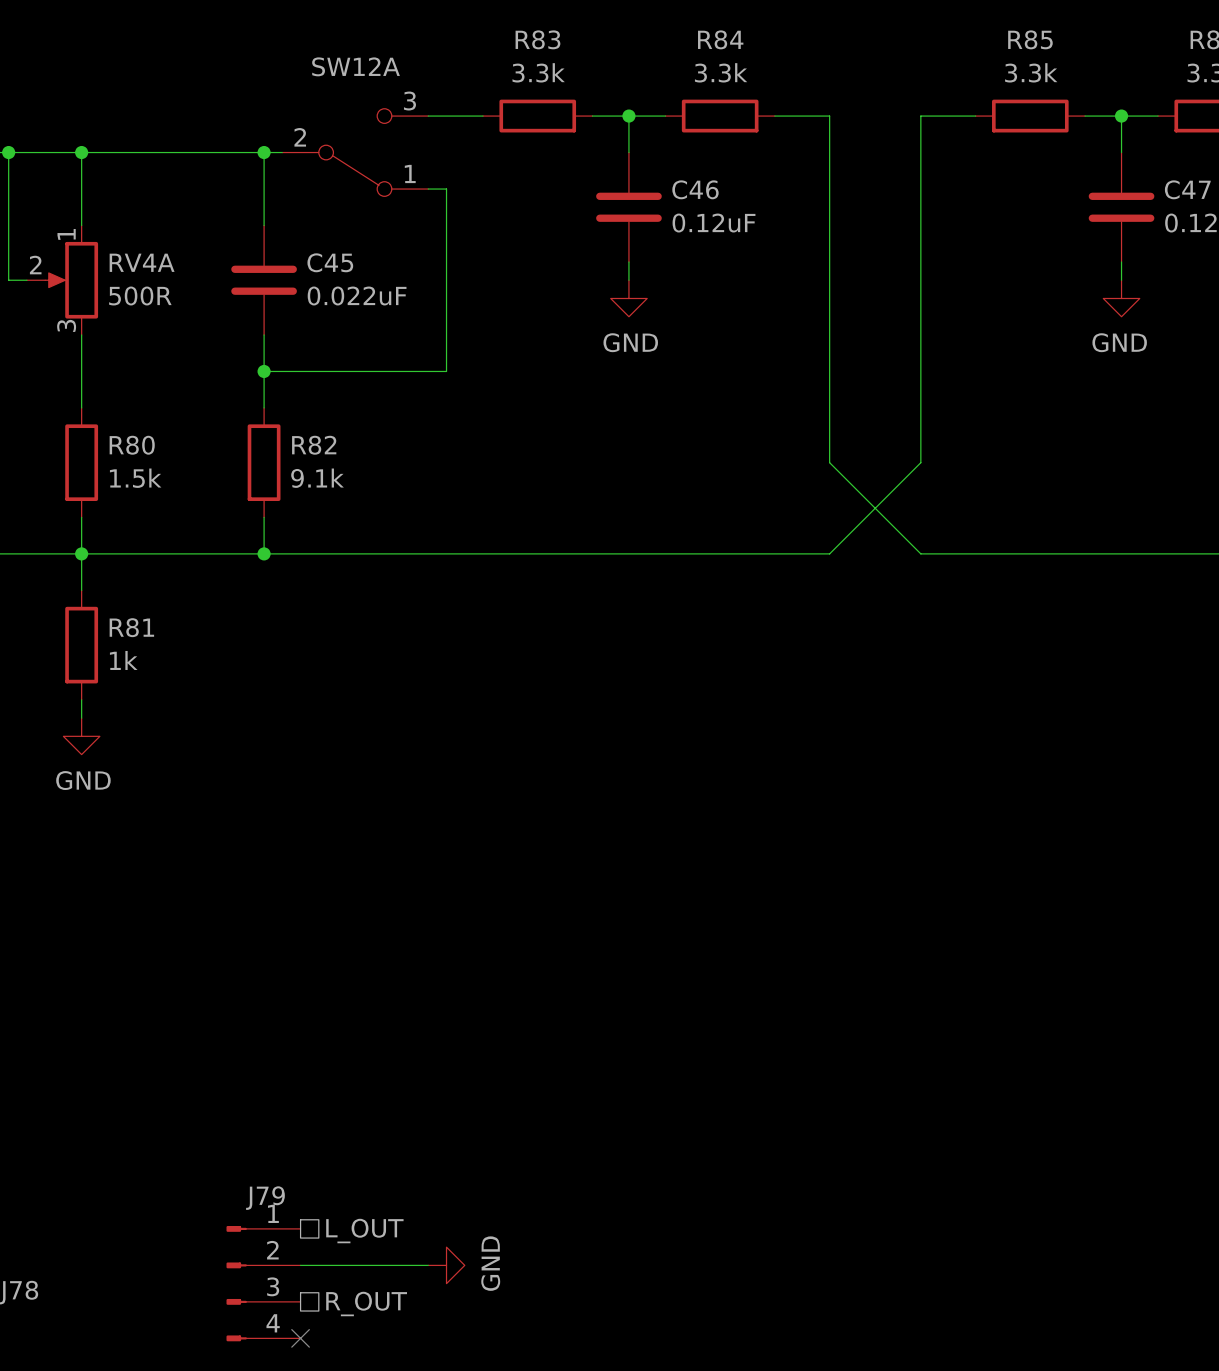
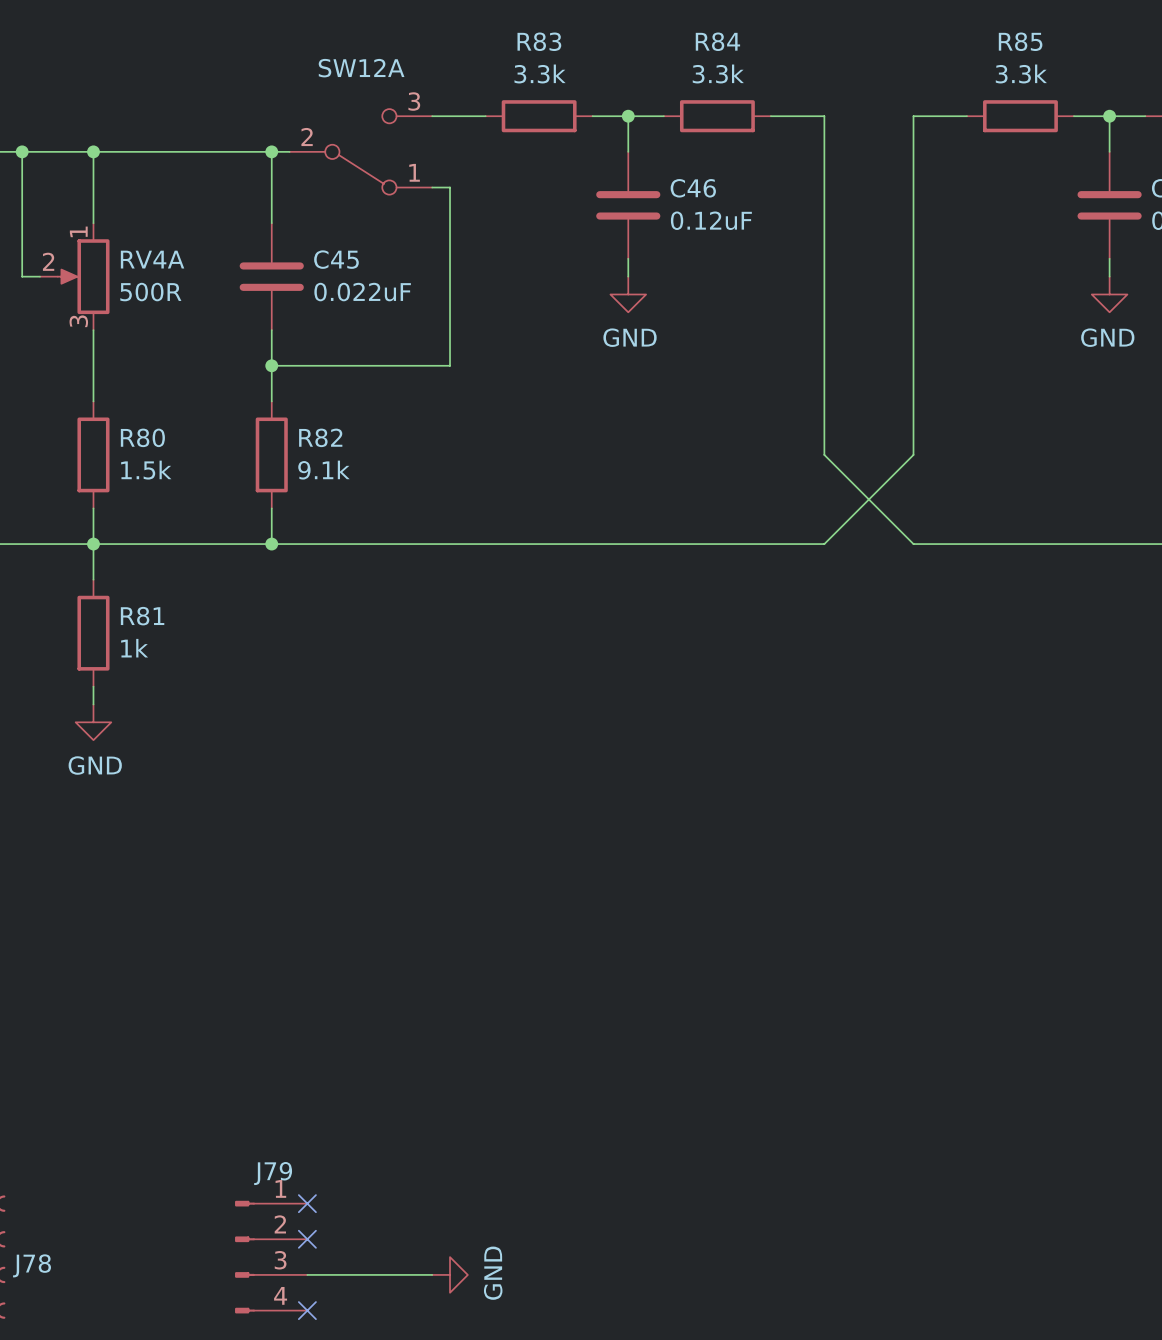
no-connect mark: none -> (307, 1203)
hierarchical label: L_OUT (364, 1231) -> none
wire: (300, 1265) (428, 1265) -> (307, 1274) (432, 1274)
no-connect mark: none -> (307, 1239)
power symbol position: GND (446, 1265) -> GND (450, 1274)
hierarchical label: R_OUT (366, 1303) -> none

